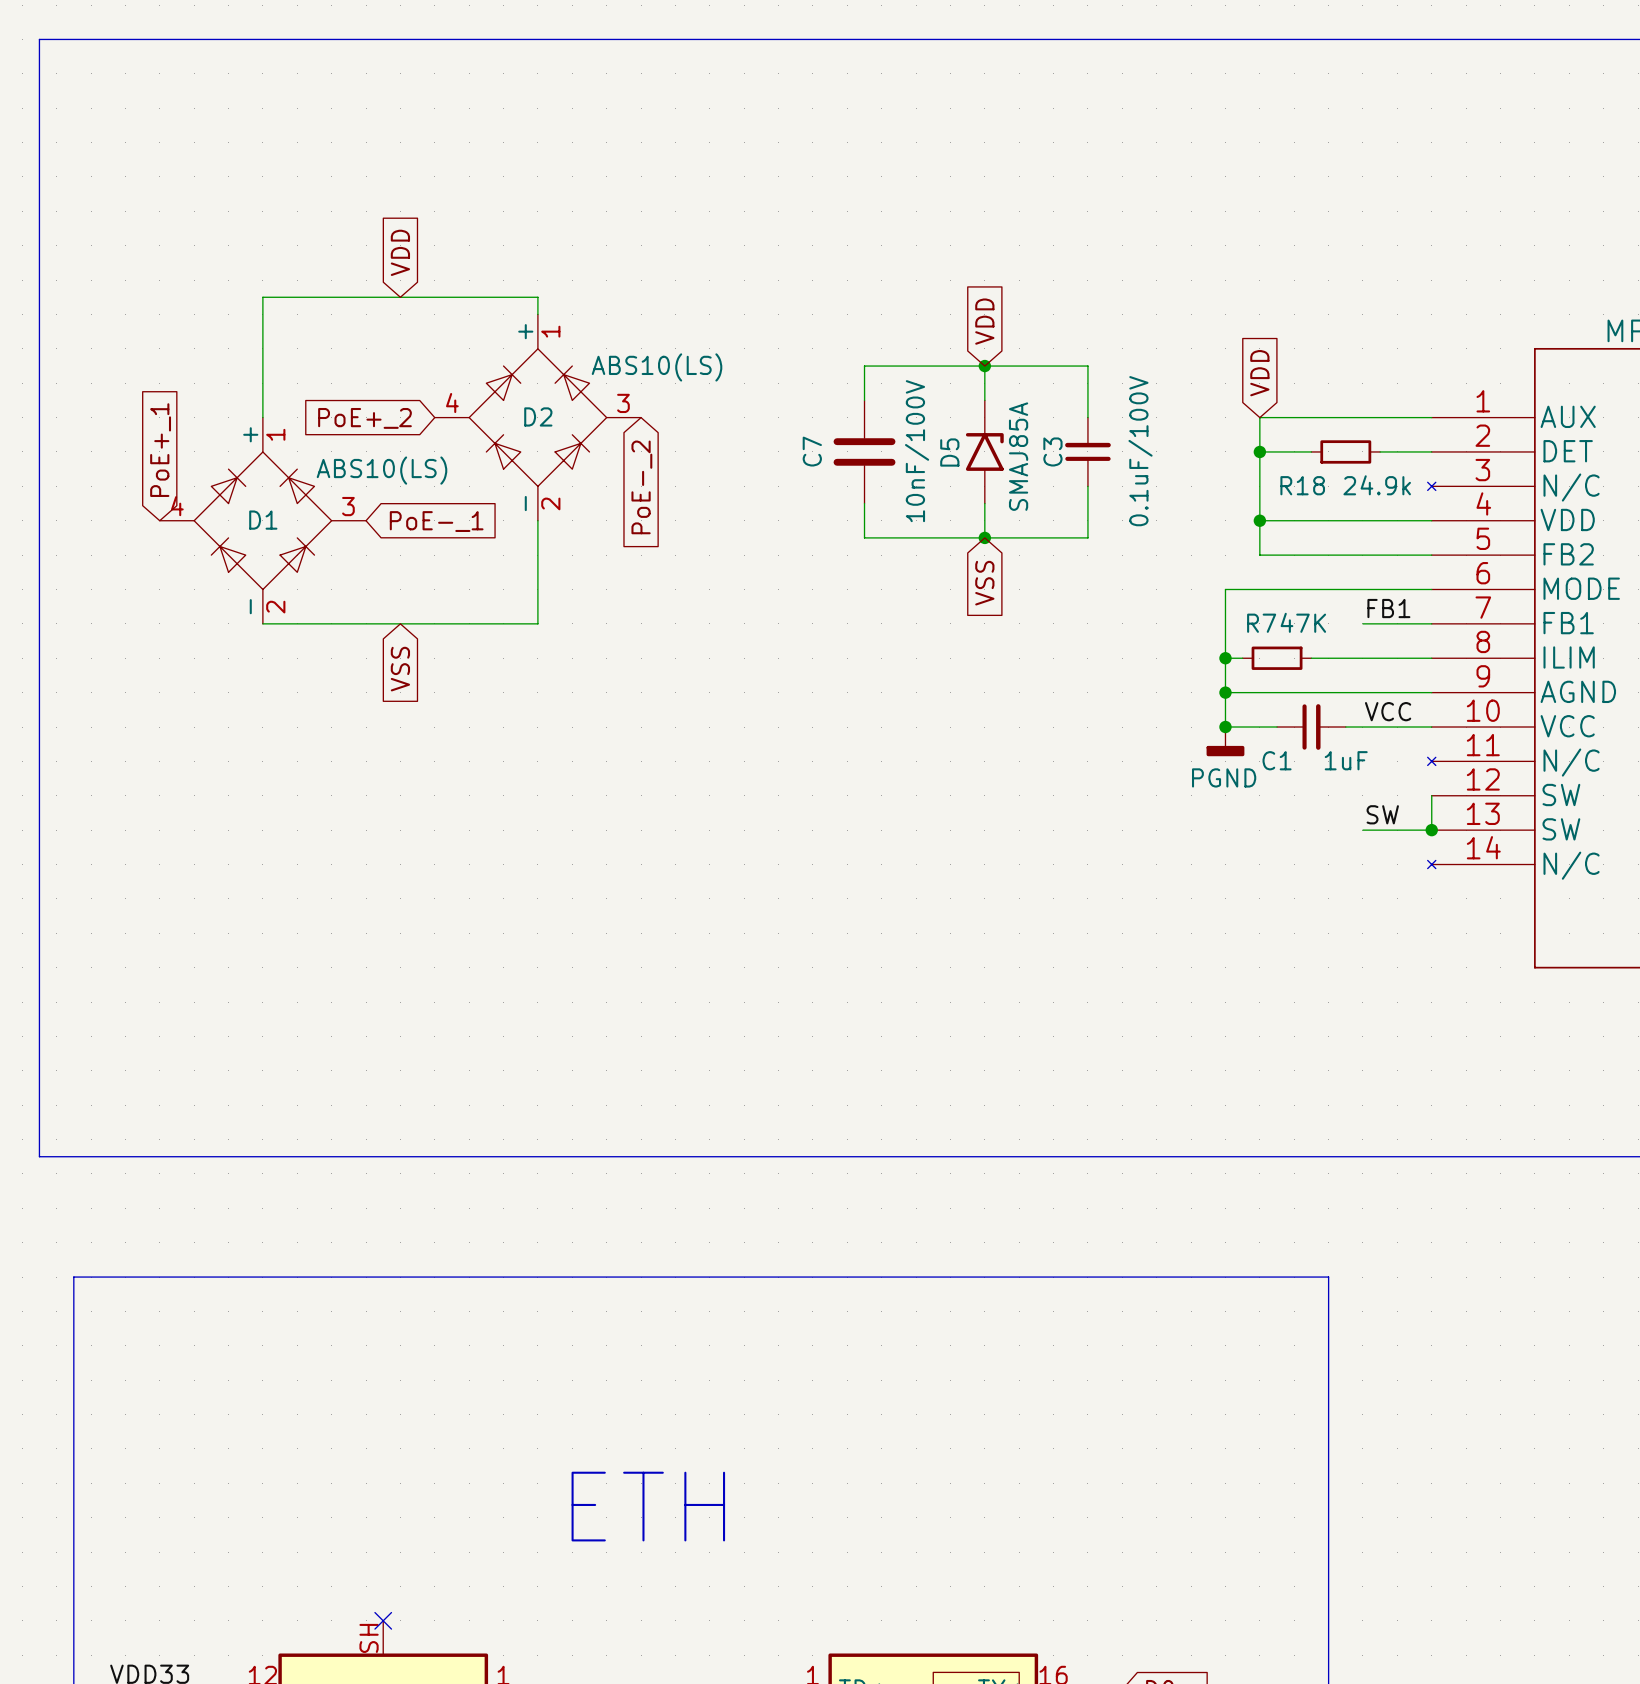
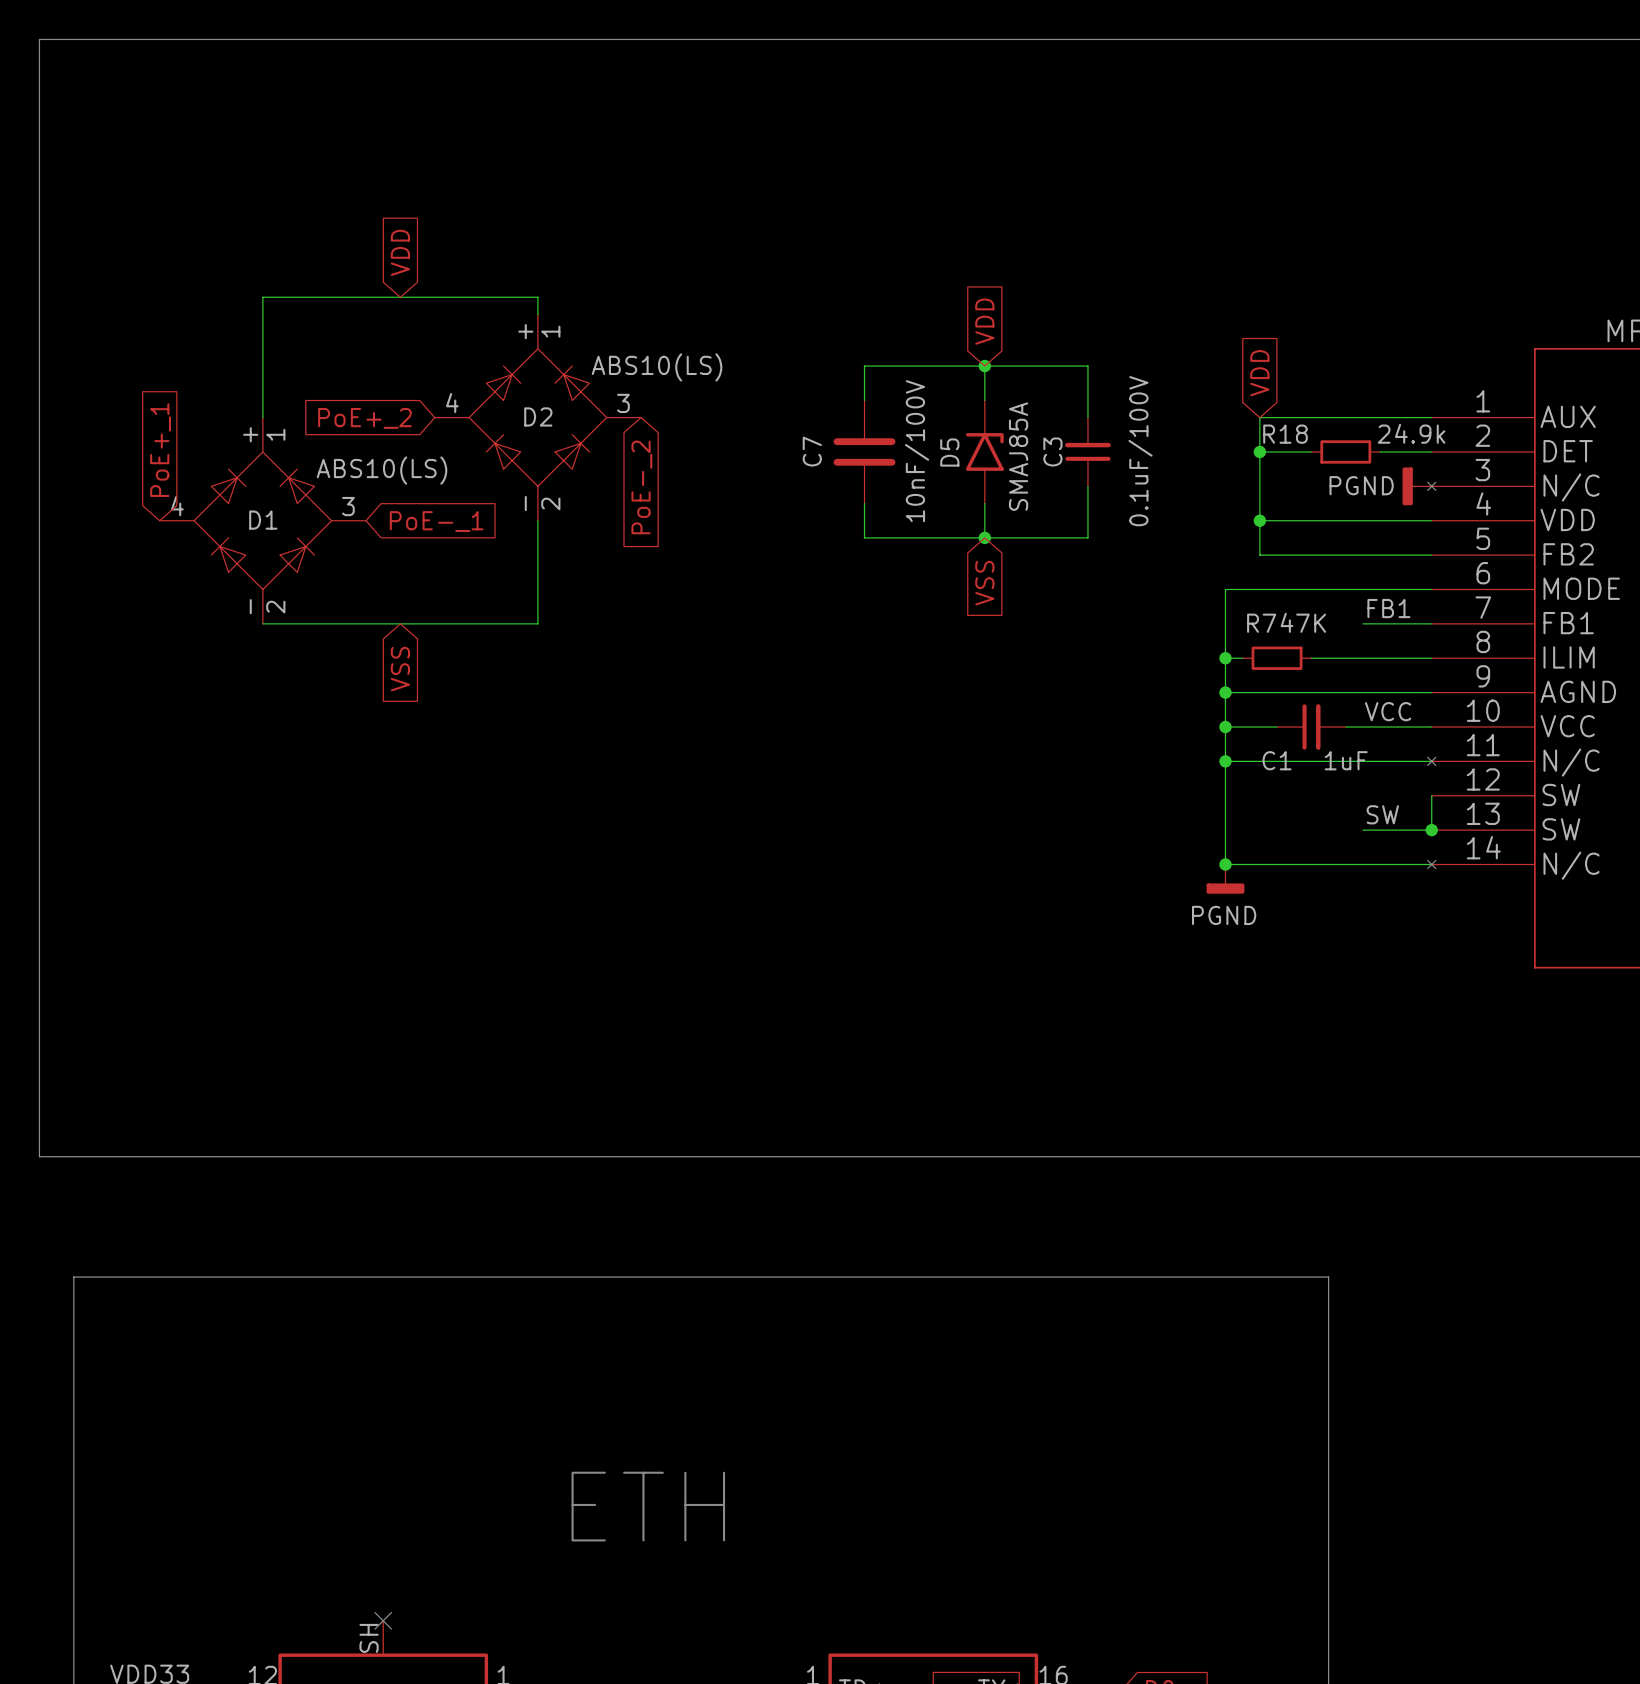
R18 name position: R18 (1302, 485) -> R18 (1285, 434)
R18 value position: 24.9k (1377, 485) -> 24.9k (1411, 433)
power symbol: none -> PGND (1417, 486)
wire: none -> (1225, 727) (1225, 864) (1431, 864)
power symbol position: PGND (1225, 741) -> PGND (1225, 879)
wire: none -> (1225, 761) (1431, 761)
junction: none -> (1225, 761)
junction: none -> (1225, 864)

